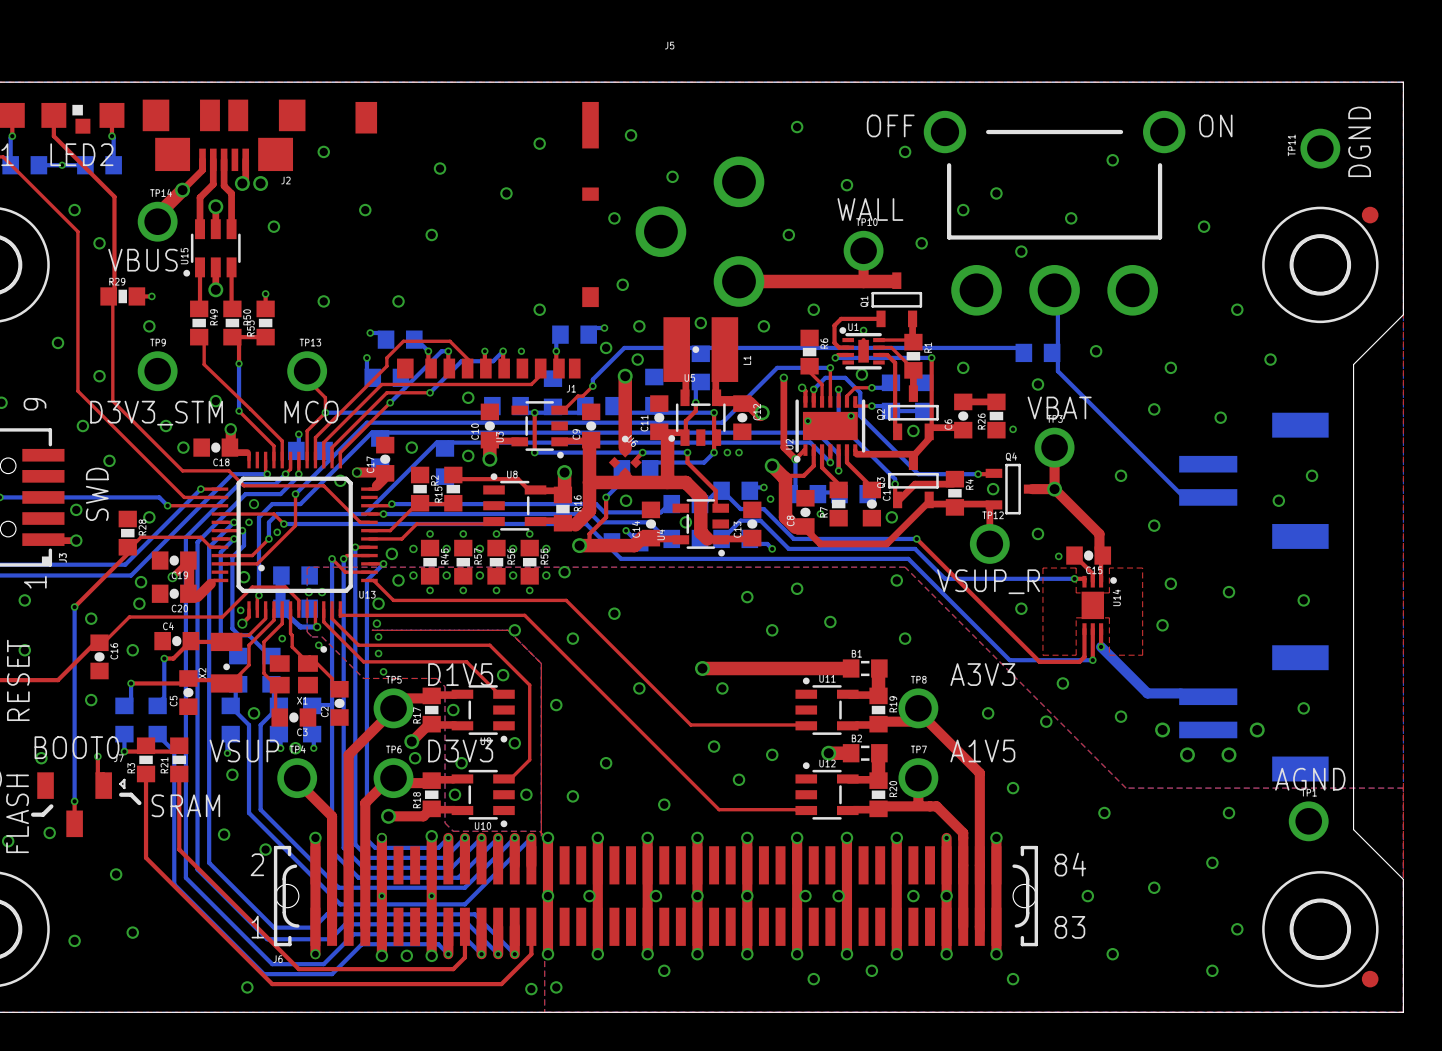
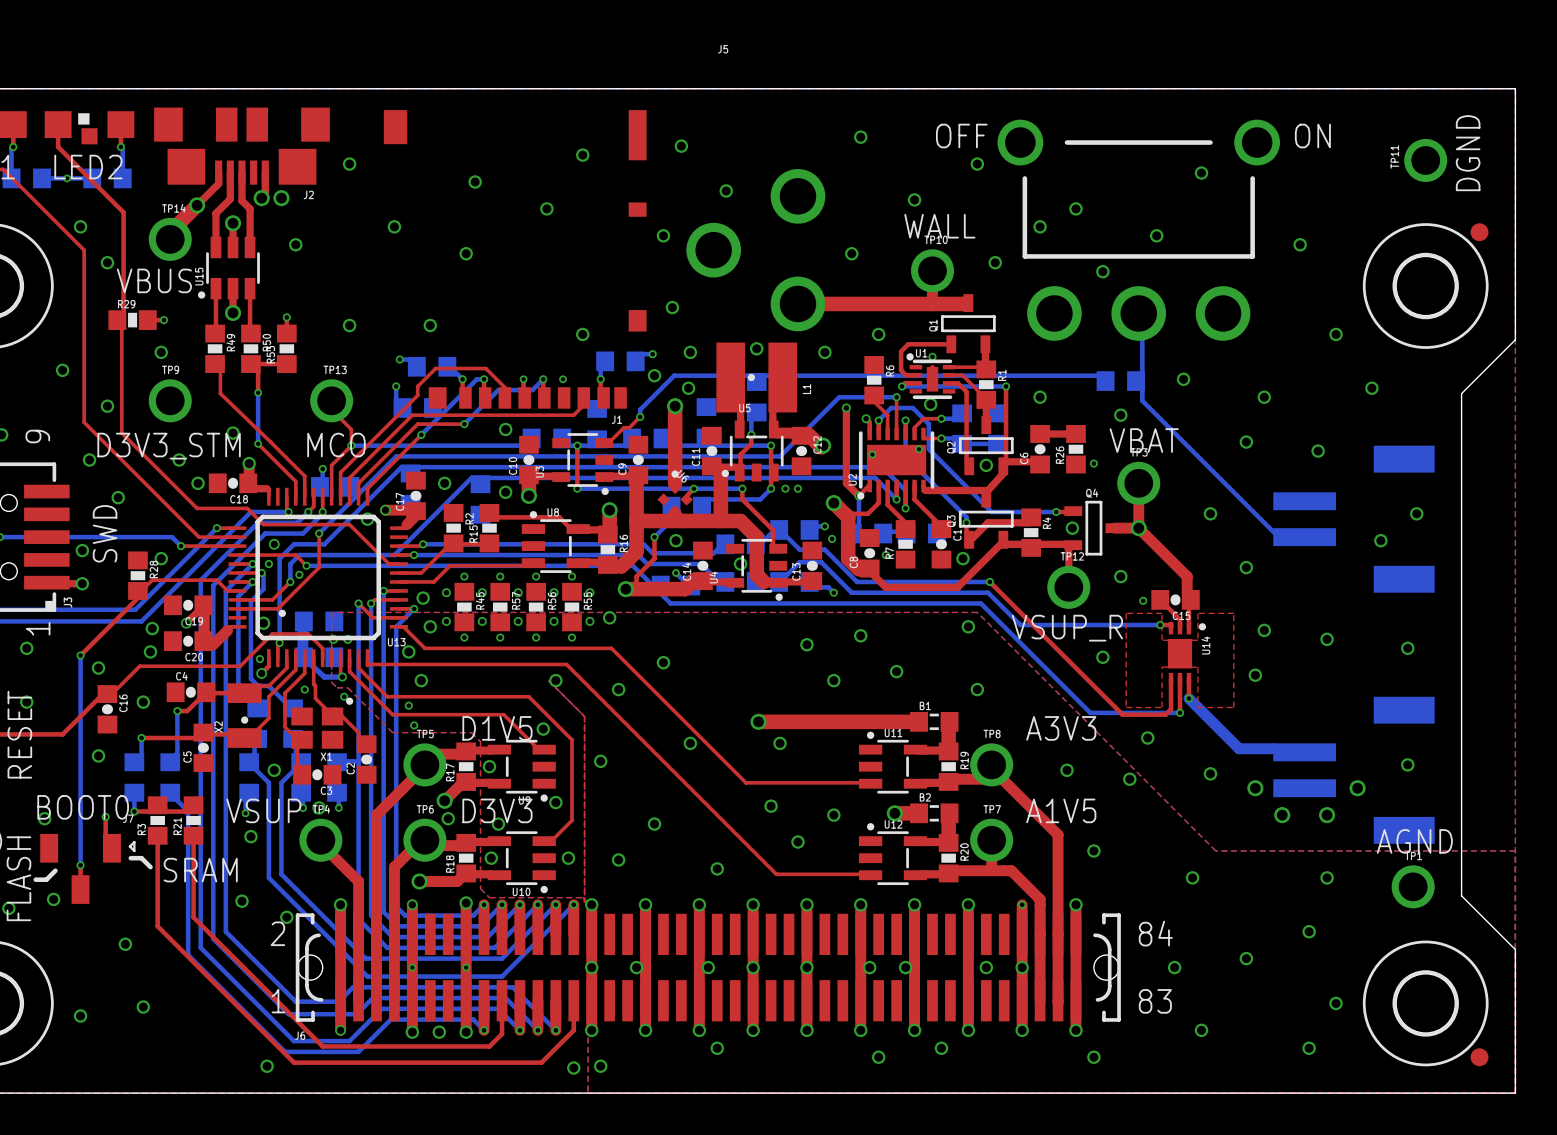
via: (376, 623) -> none
top zone outline: (371, 630) (508, 630) -> none
via: none -> (421, 680)
via: (378, 636) -> none

